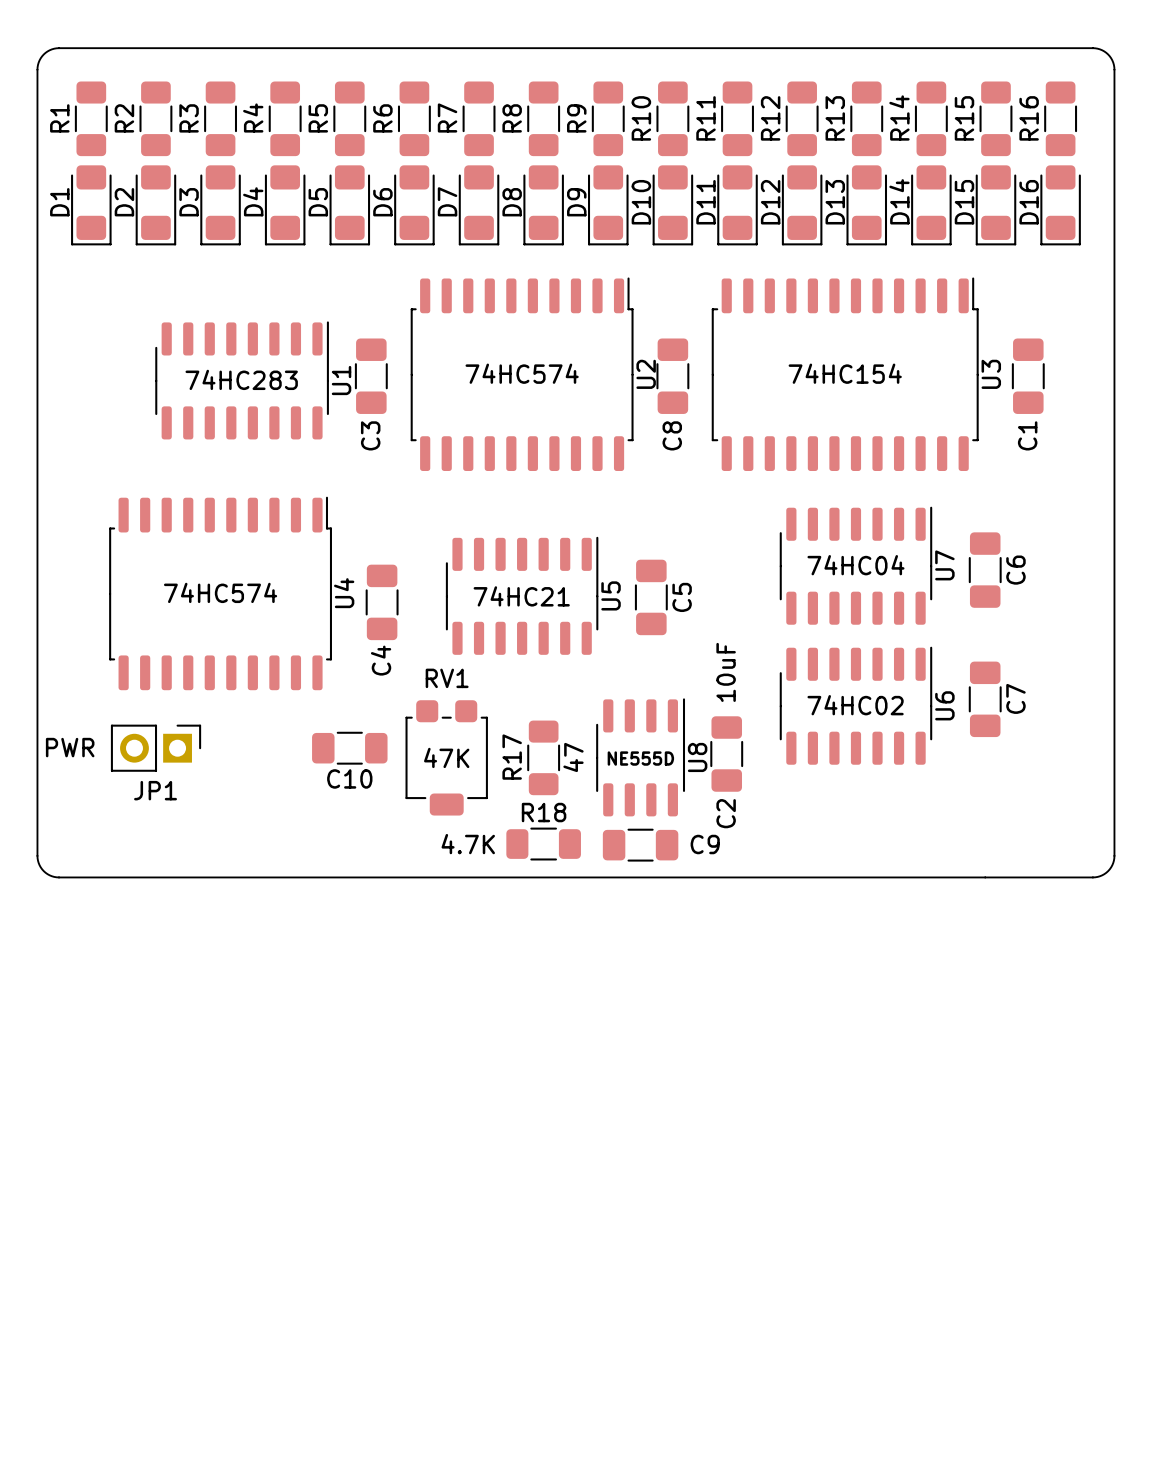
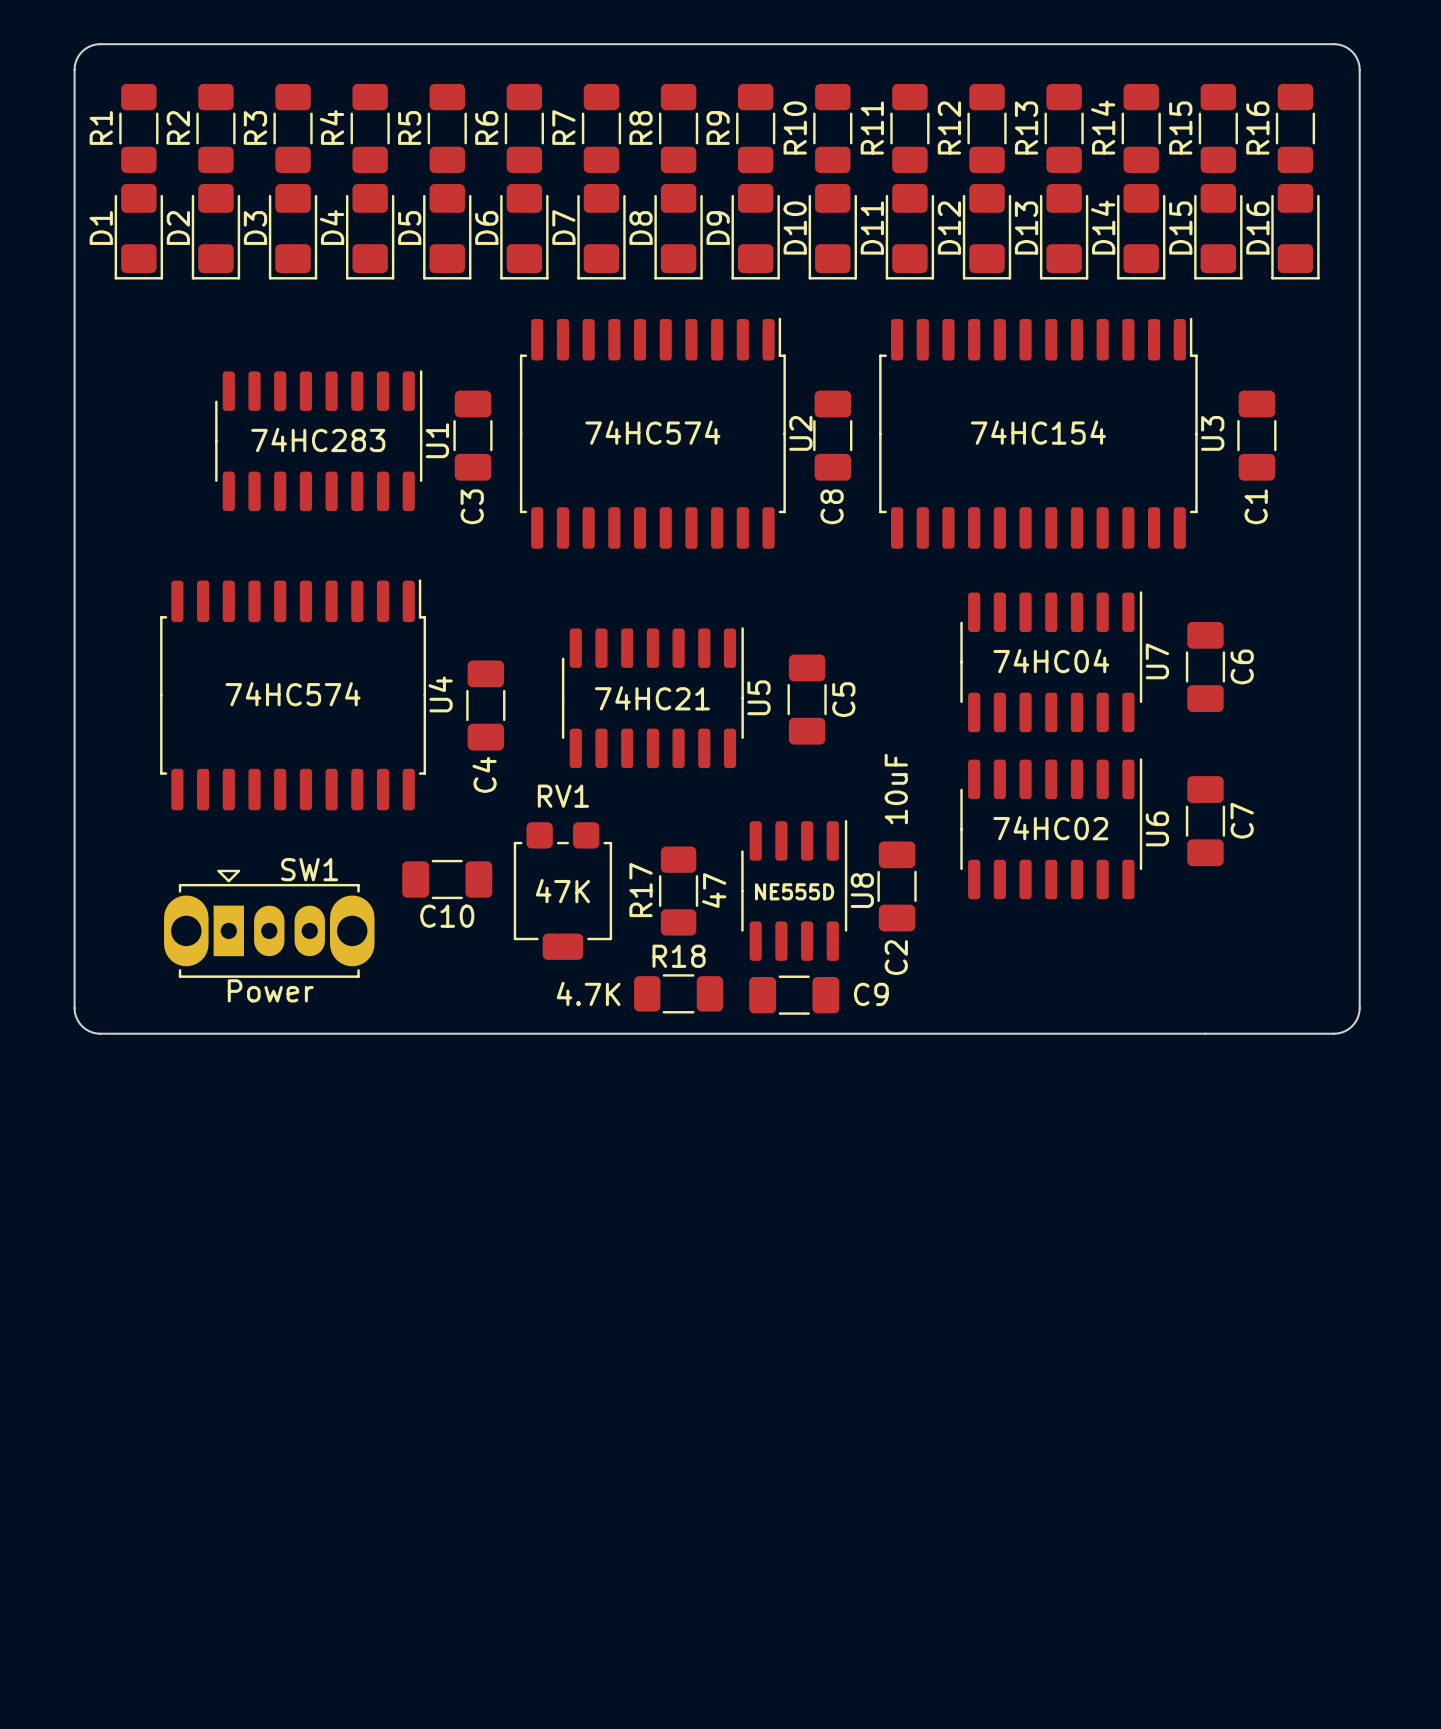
JP1: PWR (156, 748) -> none
SW1: none -> Power (269, 923)

